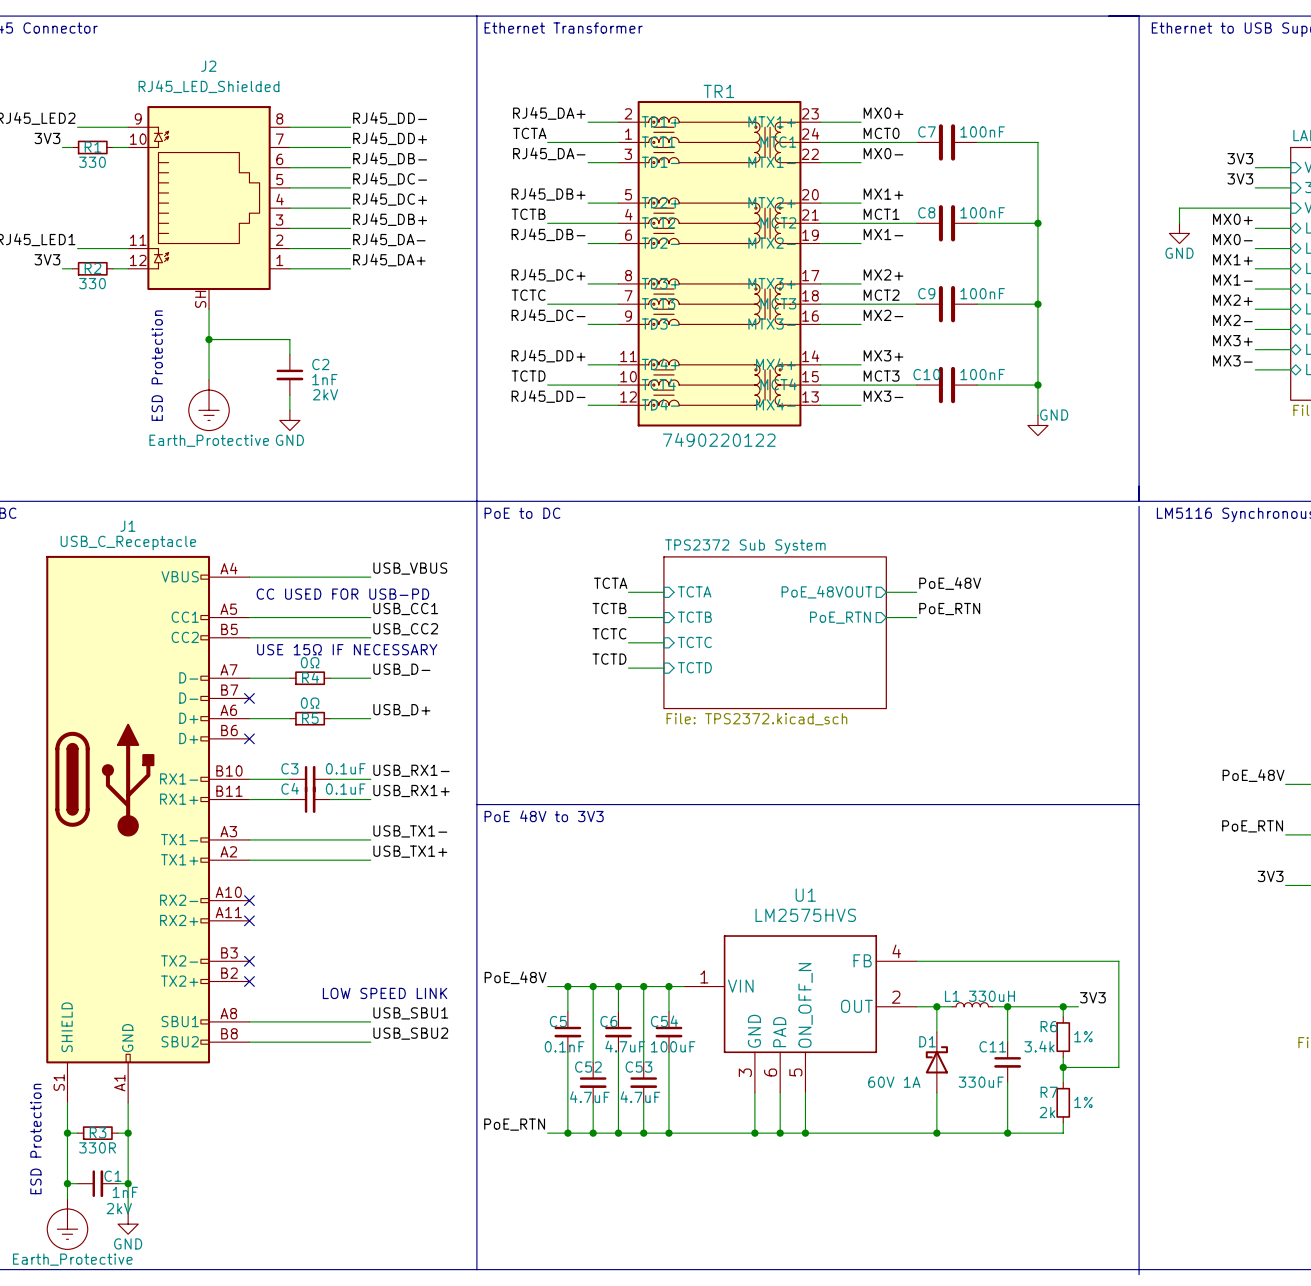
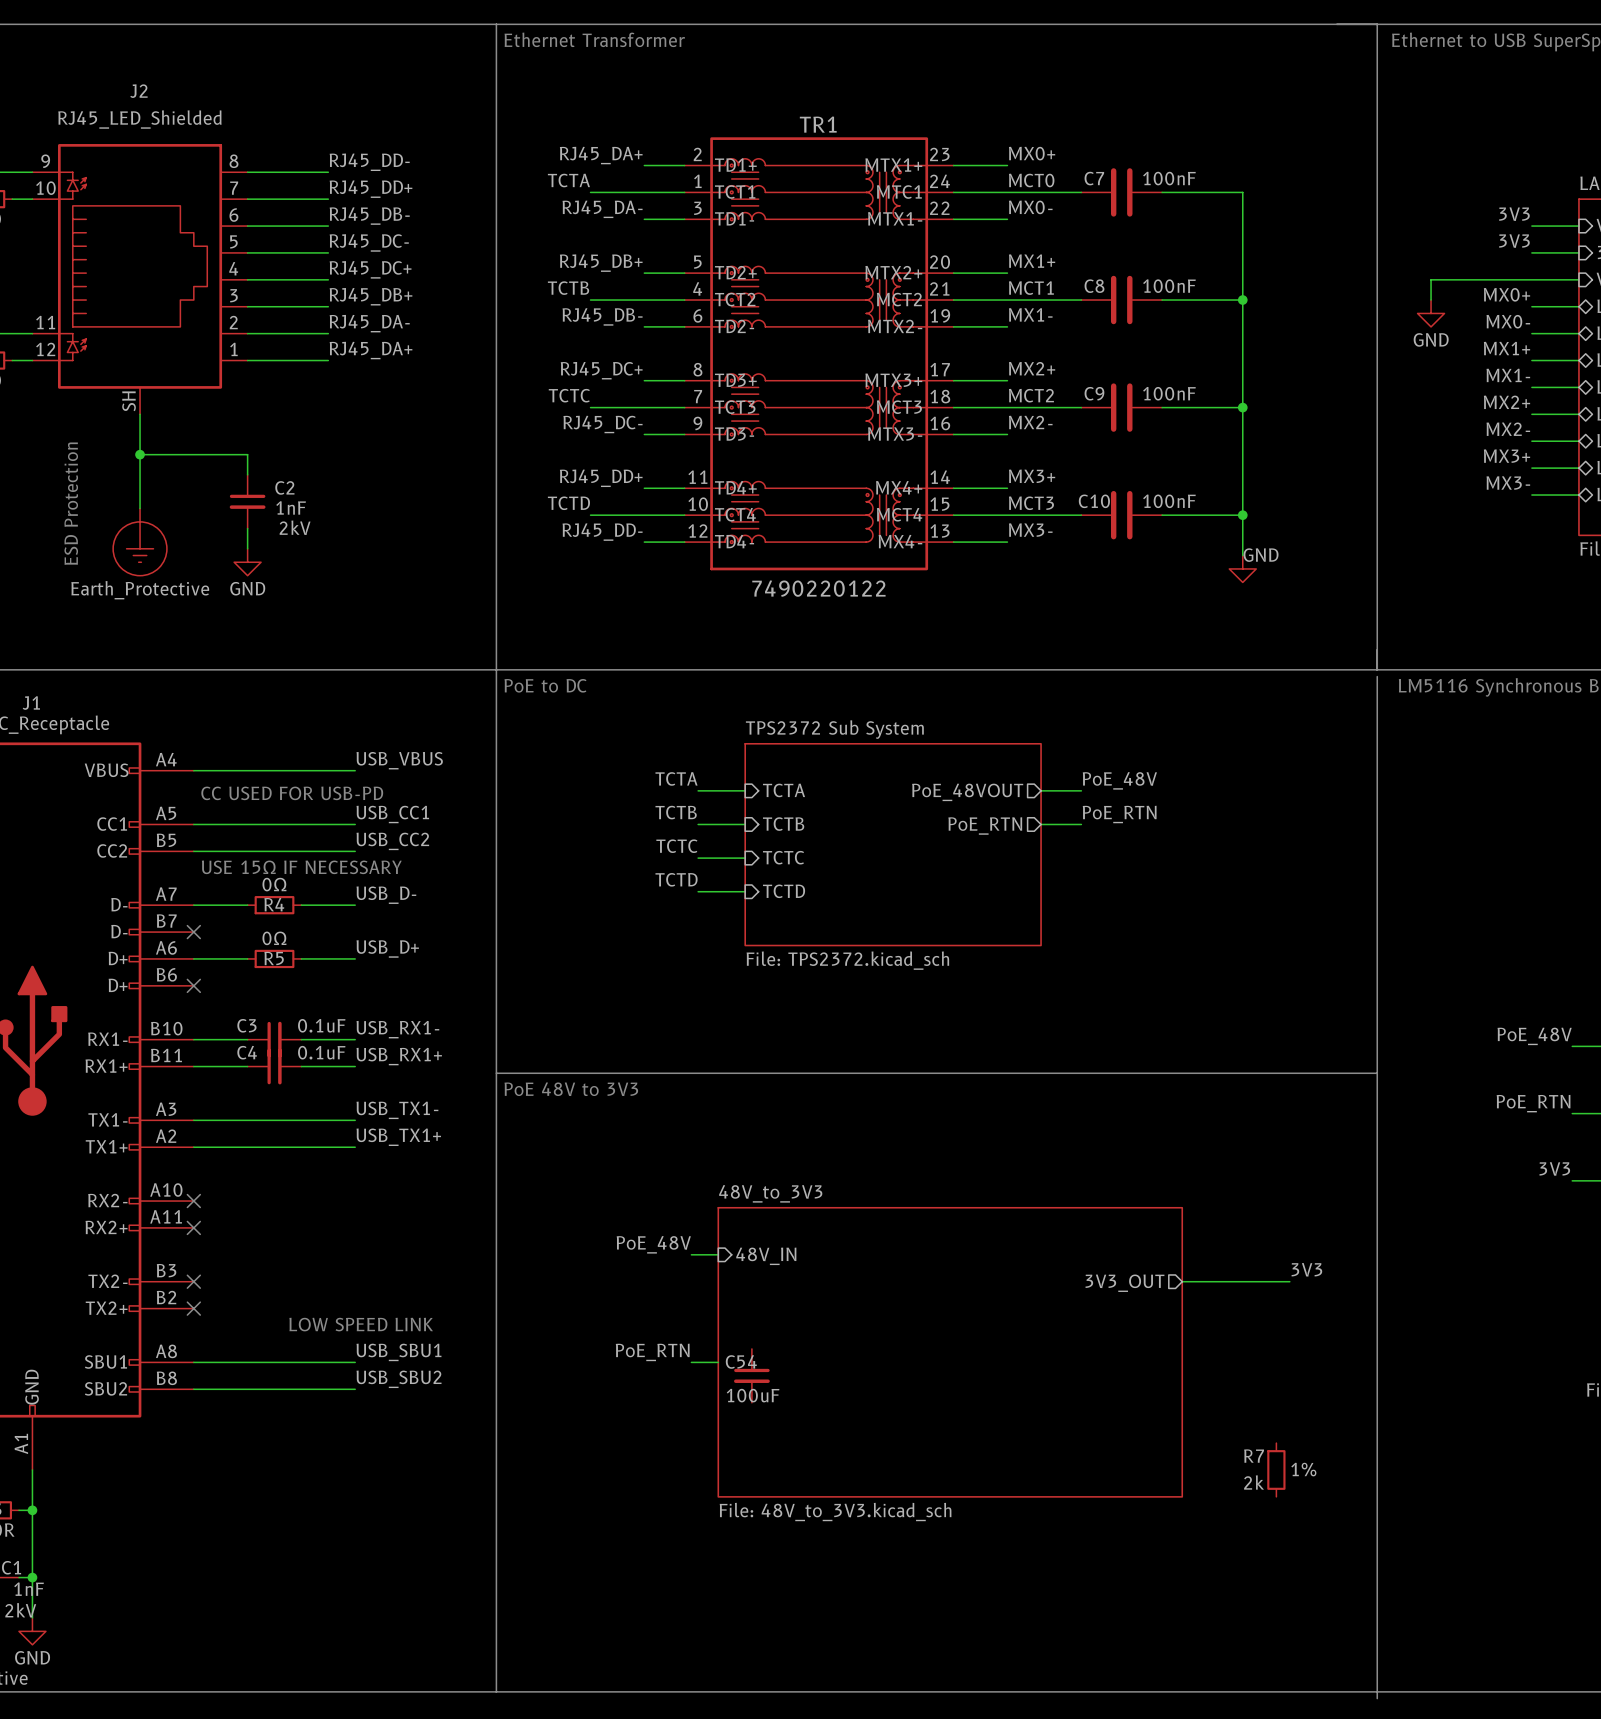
sheet pin: none -> 48V_IN (766, 1256)
wire: none -> (691, 1254) (718, 1254)
wire: (916, 961) (992, 961) -> none
sheet pin: none -> 3V3_OUT (1124, 1283)
wire: (1073, 961) (1118, 961) (1118, 1067) (1063, 1067) -> none
label position: PoE_48V (515, 977) -> PoE_48V (653, 1244)
wire: (547, 986) (684, 986) -> none
wire: (567, 986) (567, 1011) -> none
junction: (567, 986) -> none
wire: (593, 986) (593, 1062) -> none
junction: (593, 986) -> none
wire: (618, 986) (618, 1011) -> none
junction: (618, 986) -> none
junction: (643, 986) -> none
wire: (668, 986) (668, 1011) -> none
junction: (668, 986) -> none
label position: 3V3 (1092, 997) -> 3V3 (1306, 1269)
L1: 330uH (972, 1004) -> none
wire: (916, 1006) (952, 1006) -> none
wire: (936, 1006) (936, 1032) -> none
junction: (936, 1006) -> none
wire: (992, 1006) (1078, 1006) -> none
wire: (1007, 1006) (1007, 1042) -> none
junction: (1007, 1006) -> none
wire: (1063, 1006) (1063, 1016) -> none
junction: (1063, 1006) -> none
U1: LM2575HVS (800, 1013) -> none
sheet 48V_to_3V3: none -> File: 48V_to_3V3.kicad_sch (950, 1352)
wire: none -> (691, 1362) (718, 1362)
C5: 0.1nF (567, 1032) -> none
C6: 4.7uF (618, 1032) -> none
R6: 3.4k (1063, 1037) -> none
wire: (567, 1052) (567, 1133) -> none
wire: (618, 1052) (618, 1133) -> none
wire: (668, 1052) (668, 1133) -> none
wire: (1063, 1057) (1063, 1082) -> none
D1: 60V 1A (936, 1062) -> none
C11: 330uF (1007, 1062) -> none
junction: (1063, 1067) -> none
C52: 4.7uF (593, 1082) -> none
C53: 4.7uF (643, 1082) -> none
wire: (1007, 1082) (1007, 1133) -> none
wire: (754, 1092) (754, 1133) -> none
wire: (780, 1092) (780, 1133) -> none
wire: (805, 1092) (805, 1133) -> none
wire: (936, 1092) (936, 1133) -> none
wire: (593, 1102) (593, 1133) -> none
wire: (1063, 1123) (1063, 1133) (547, 1133) -> none
label position: PoE_RTN (514, 1124) -> PoE_RTN (652, 1352)
junction: (567, 1133) -> none
junction: (593, 1133) -> none
junction: (618, 1133) -> none
junction: (643, 1133) -> none
junction: (668, 1133) -> none
junction: (754, 1133) -> none
junction: (780, 1133) -> none
junction: (805, 1133) -> none
junction: (936, 1133) -> none
junction: (1007, 1133) -> none

